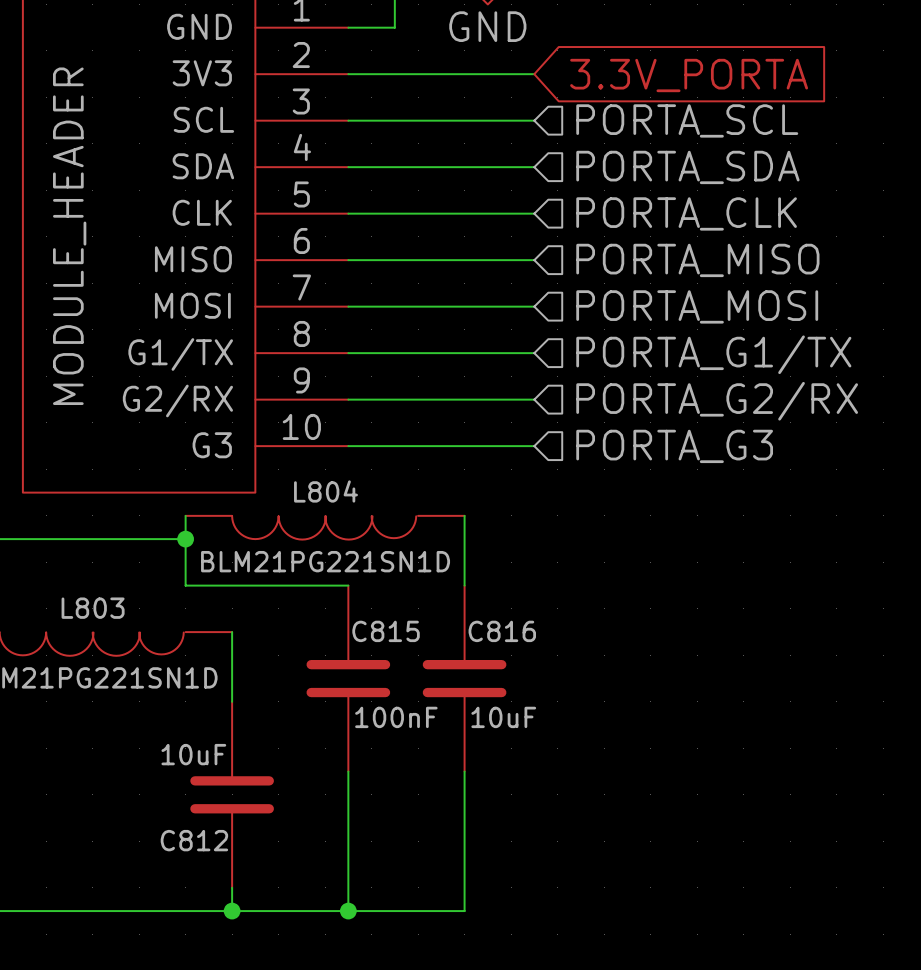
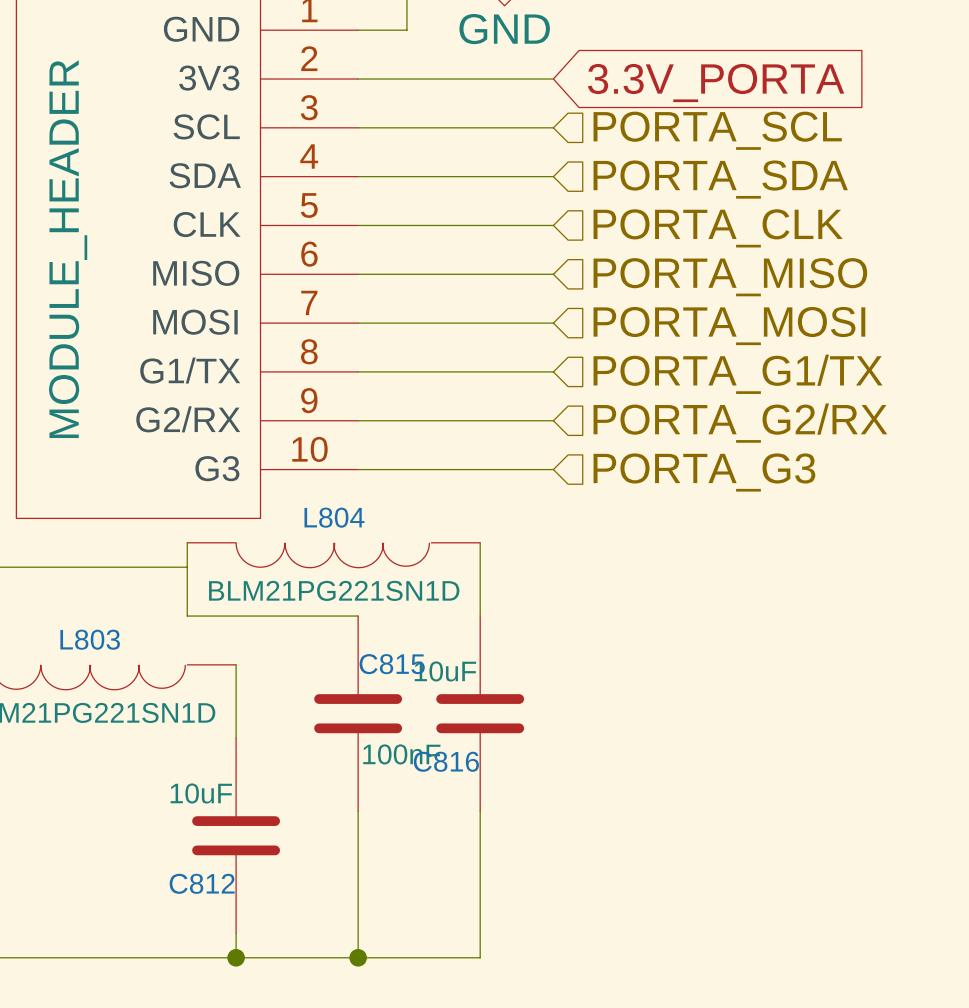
junction: (185, 539) -> none
C816 name position: C816 (502, 631) -> C816 (446, 761)
C816 value position: 10uF (503, 717) -> 10uF (445, 671)

